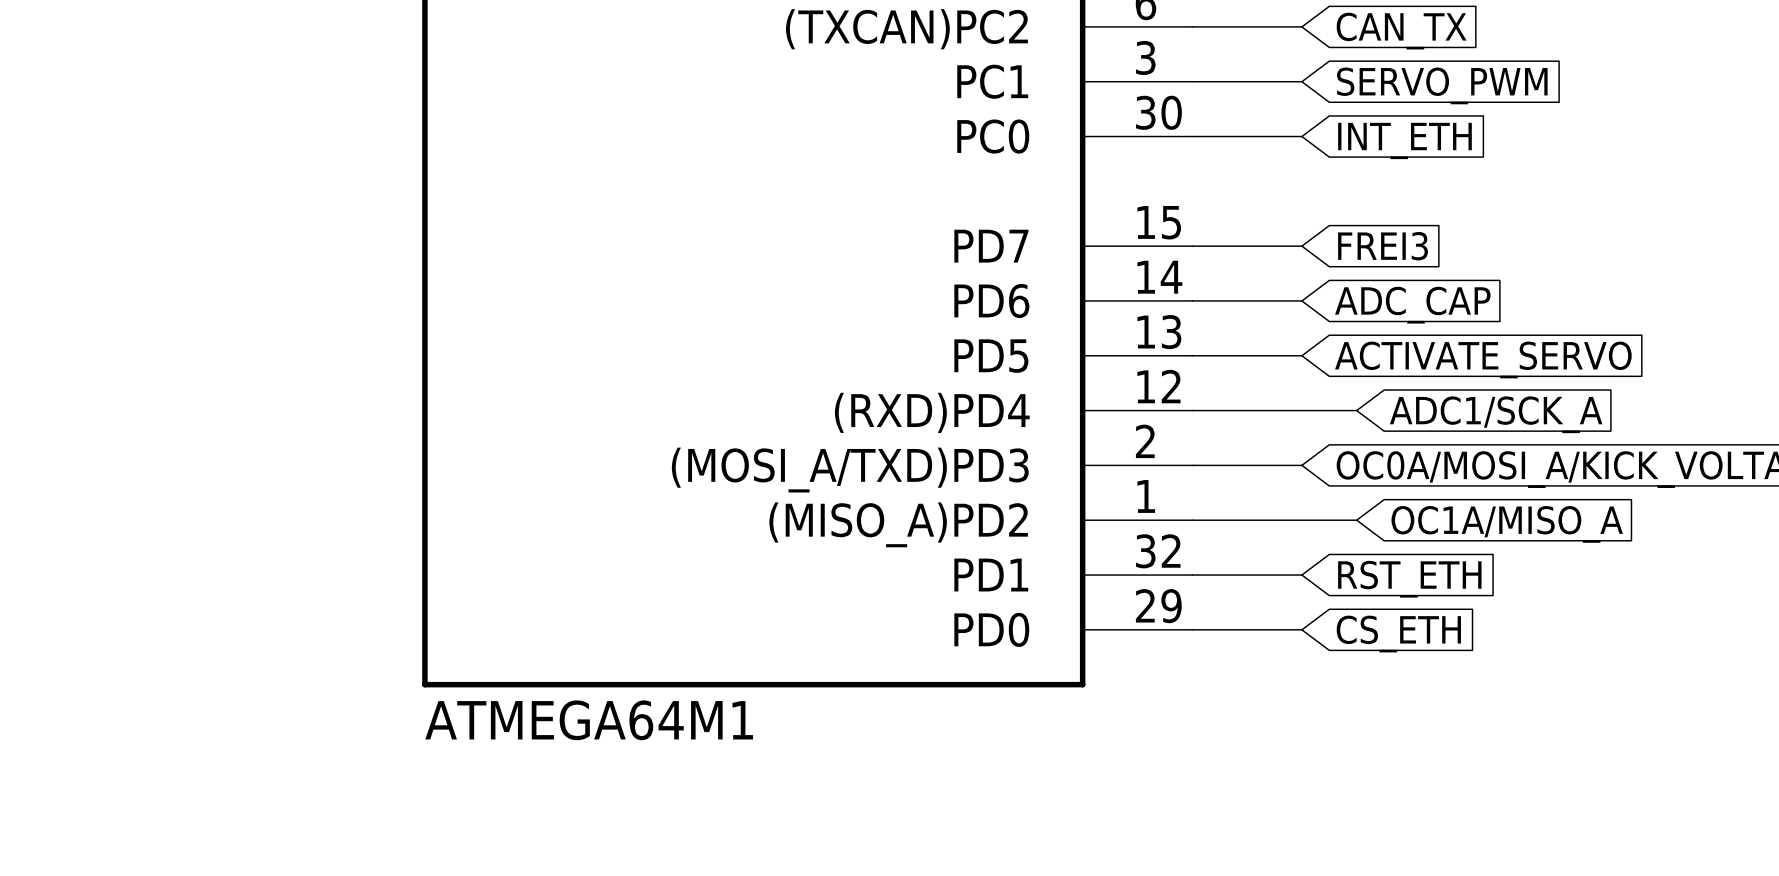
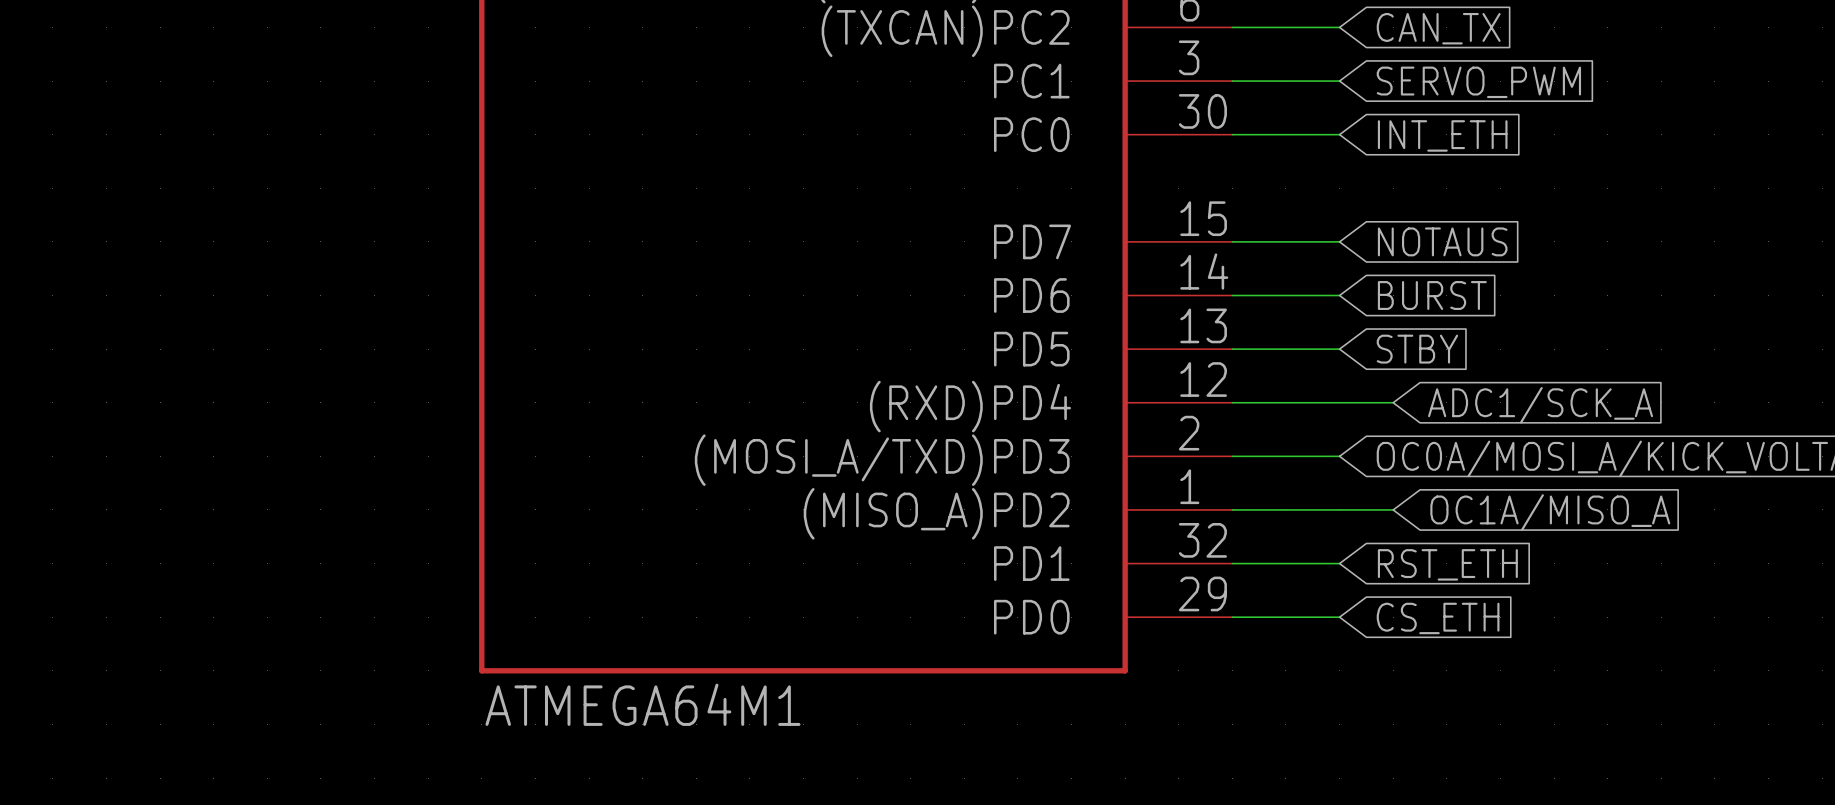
global label: FREI3 (1383, 246) -> NOTAUS (1442, 241)
global label: ADC_CAP (1412, 305) -> BURST (1432, 295)
global label: ACTIVATE_SERVO (1483, 359) -> STBY (1417, 349)

